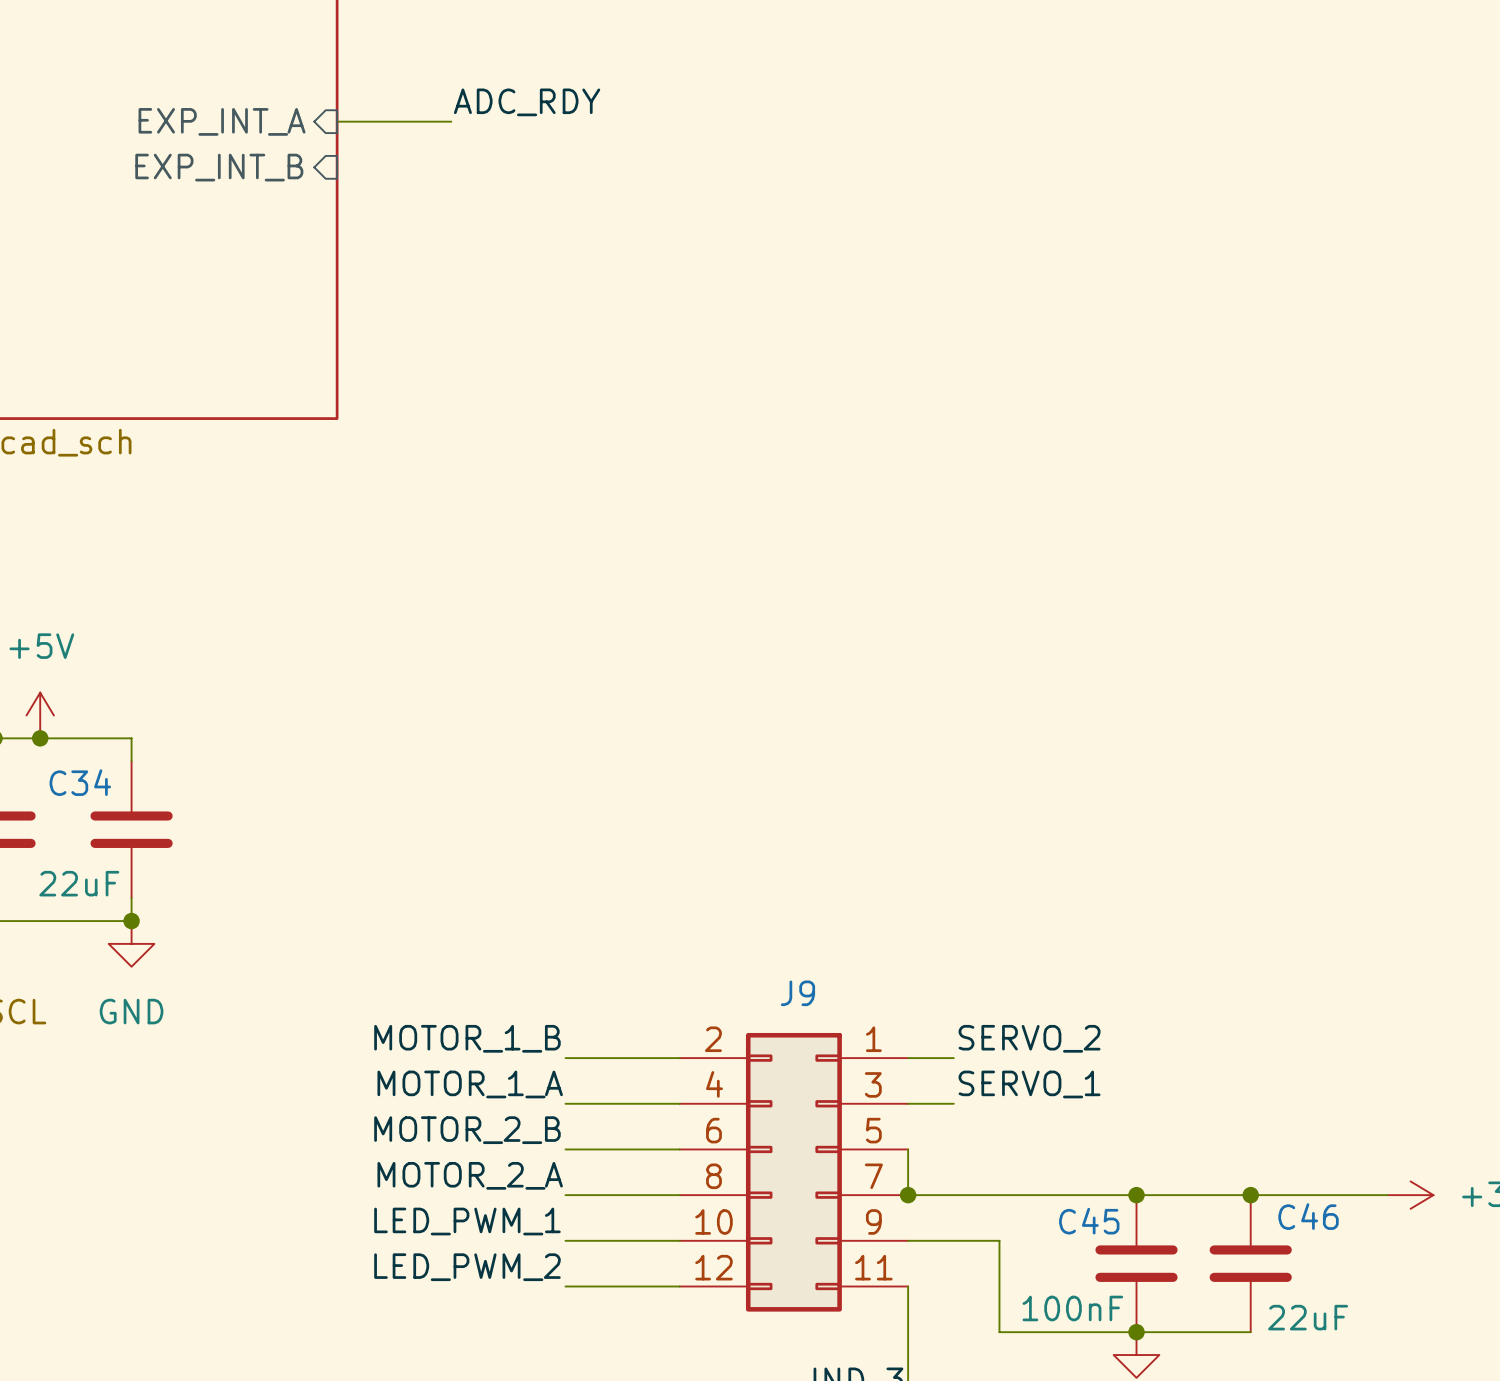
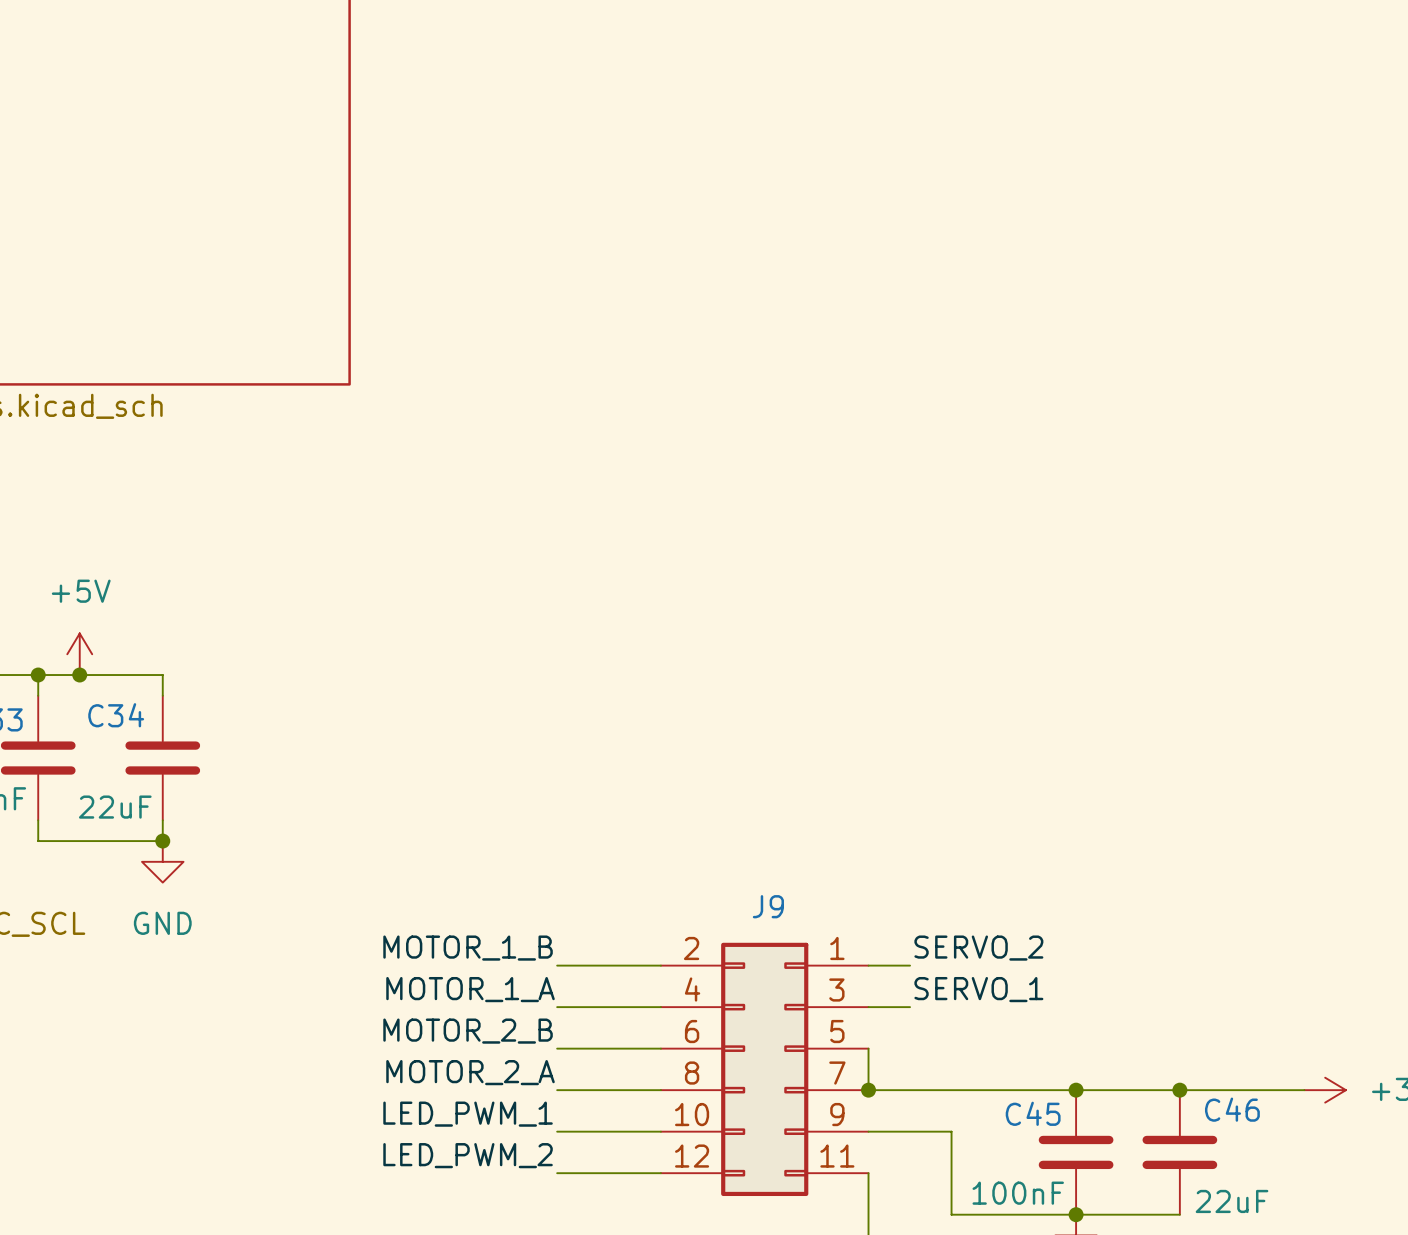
label: ADC_RDY (527, 102) -> none
sheet pin: EXP_INT_A (222, 121) -> none
wire: (337, 121) (451, 121) -> none
sheet pin: EXP_INT_B (219, 167) -> none

